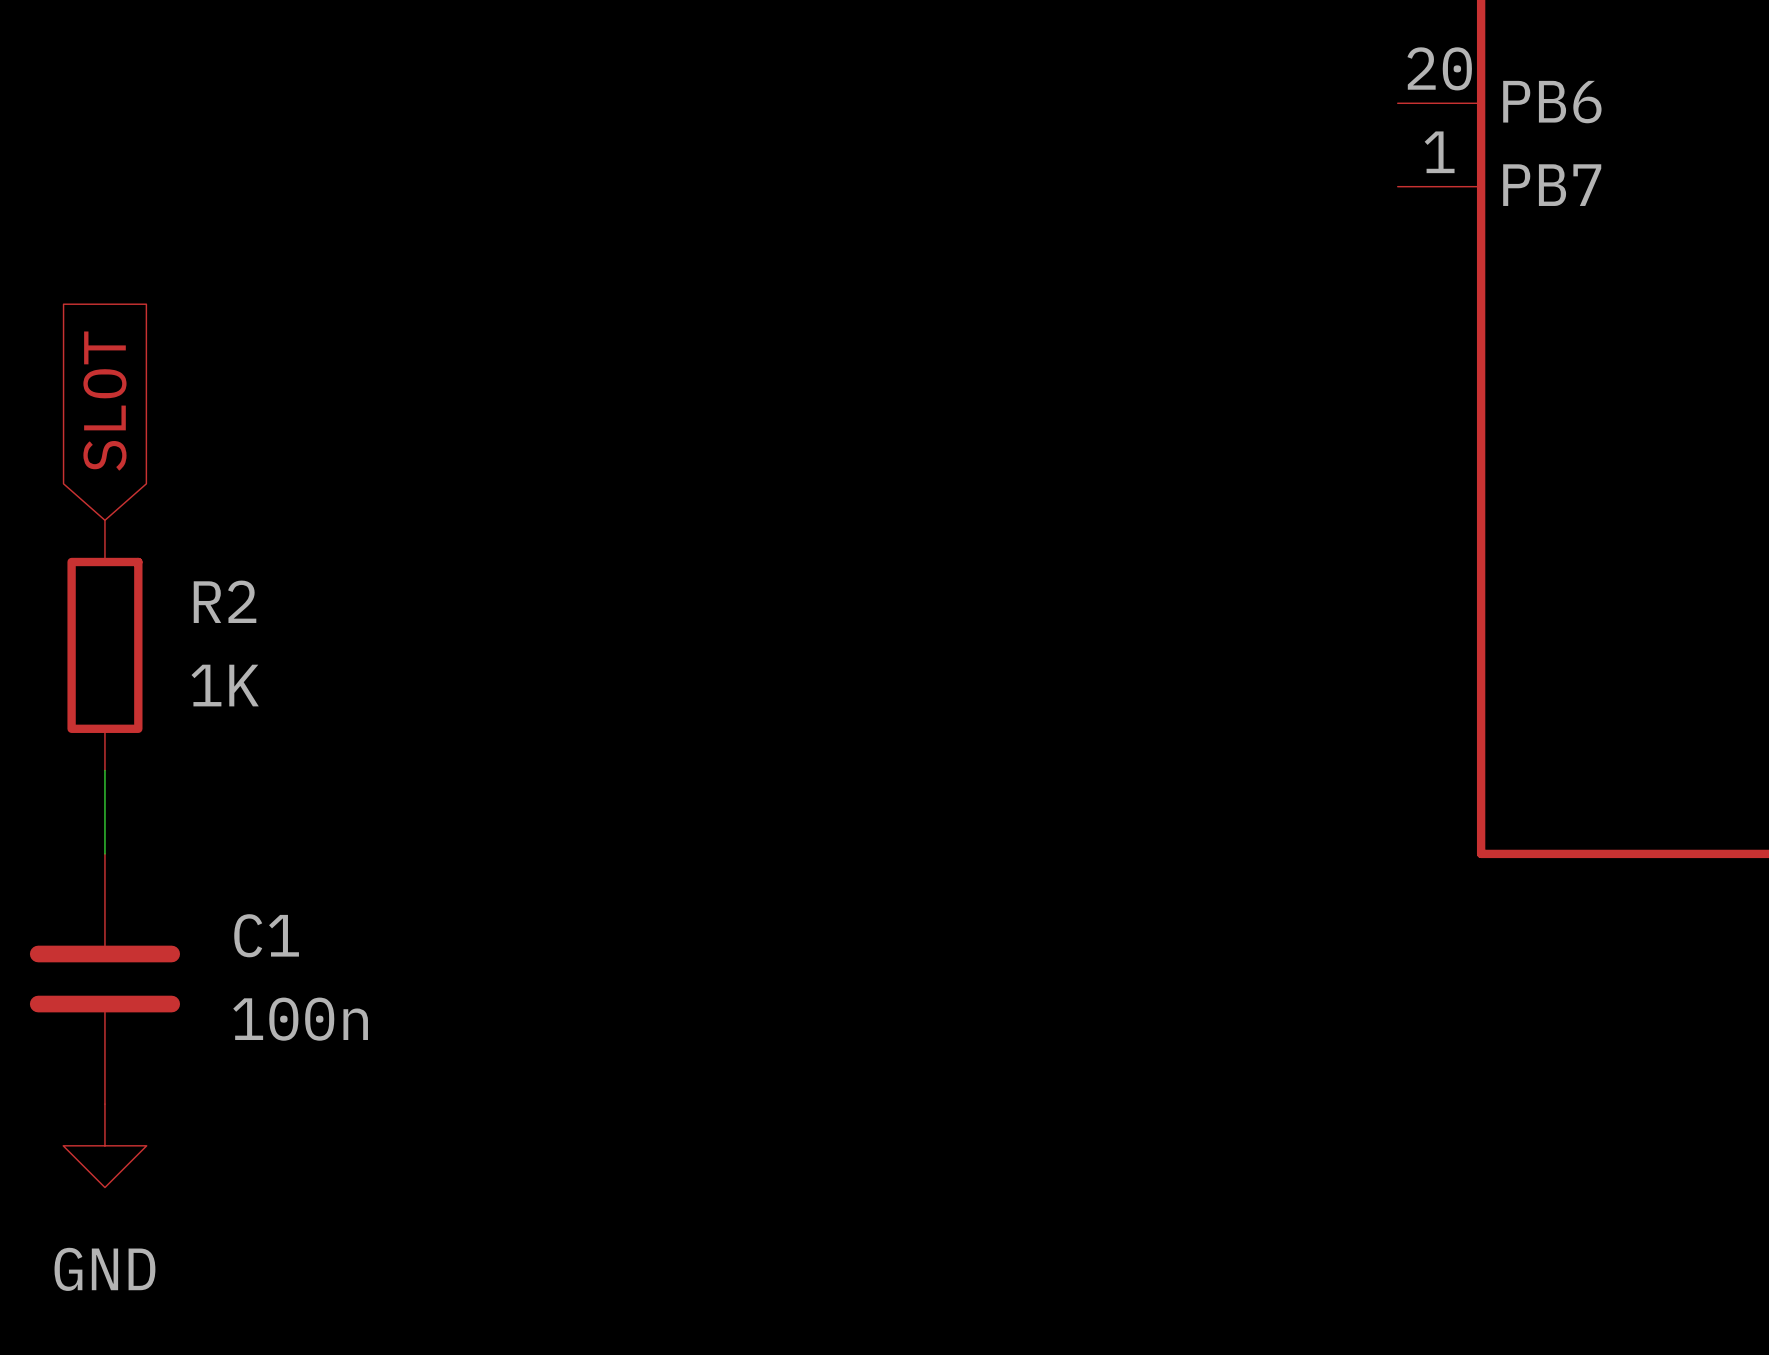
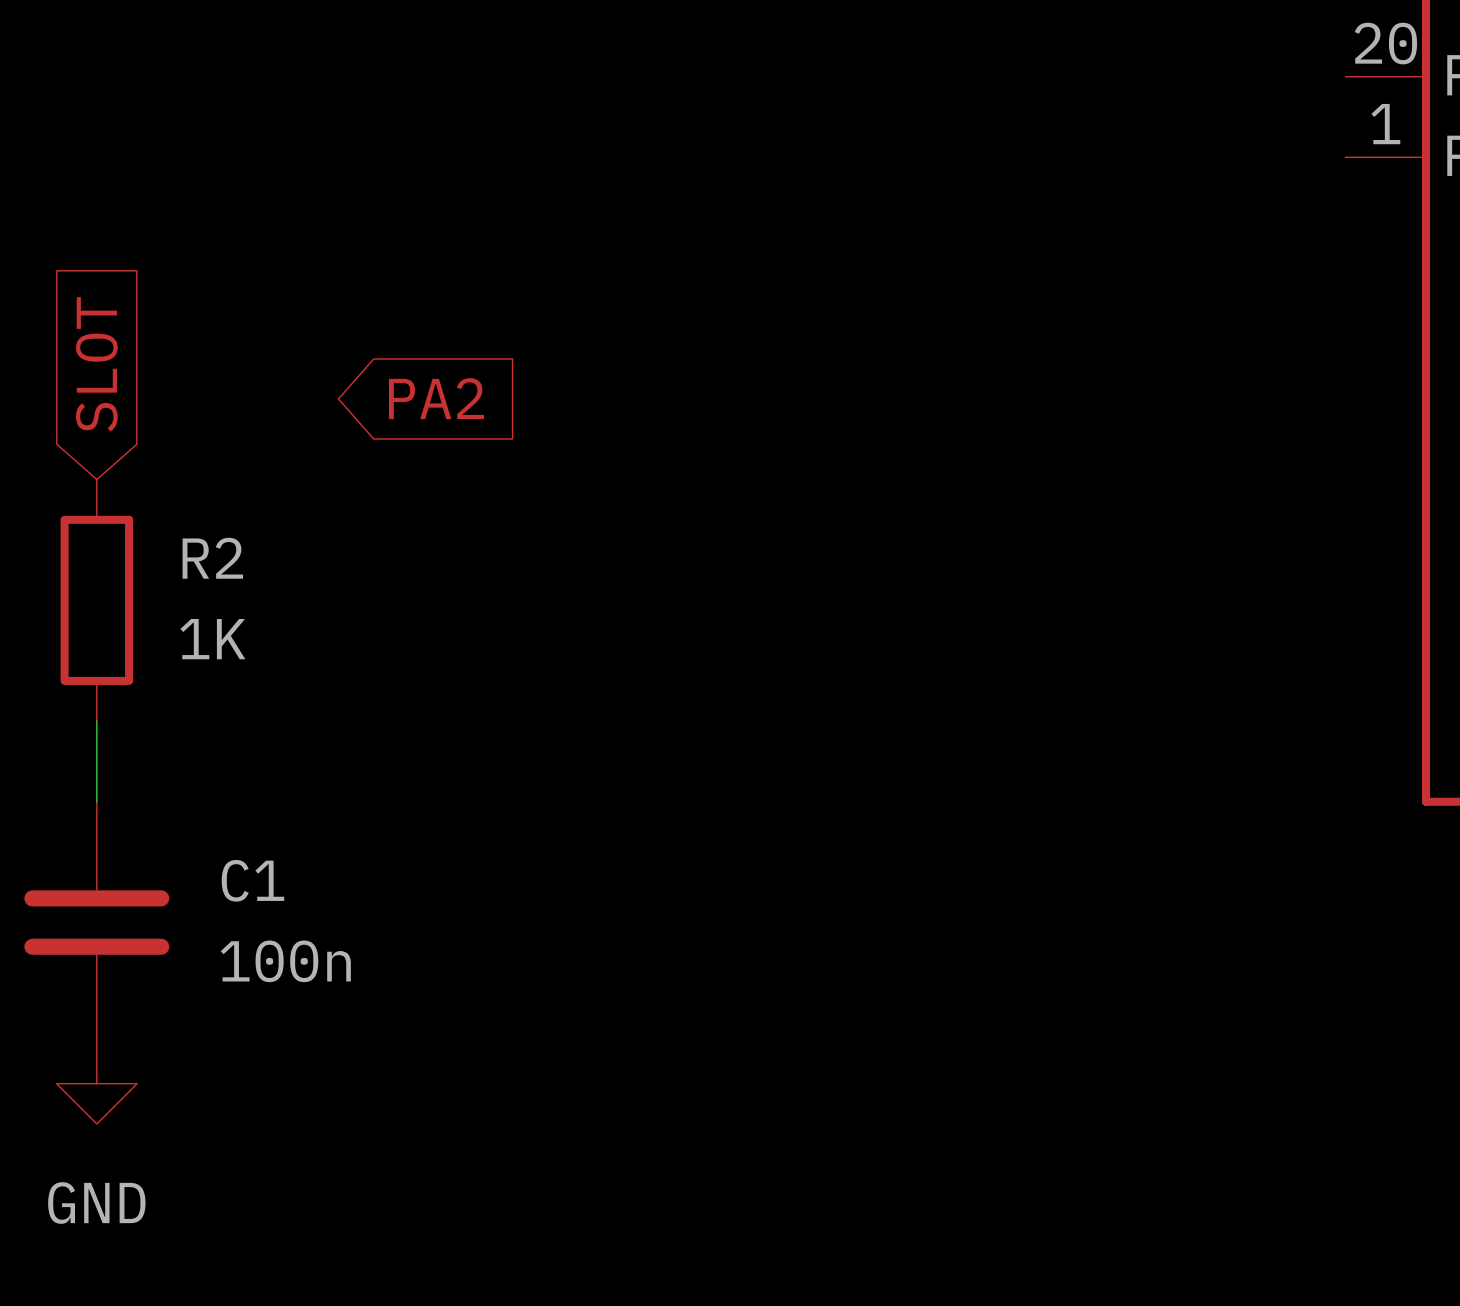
global label: none -> PA2 (436, 398)

